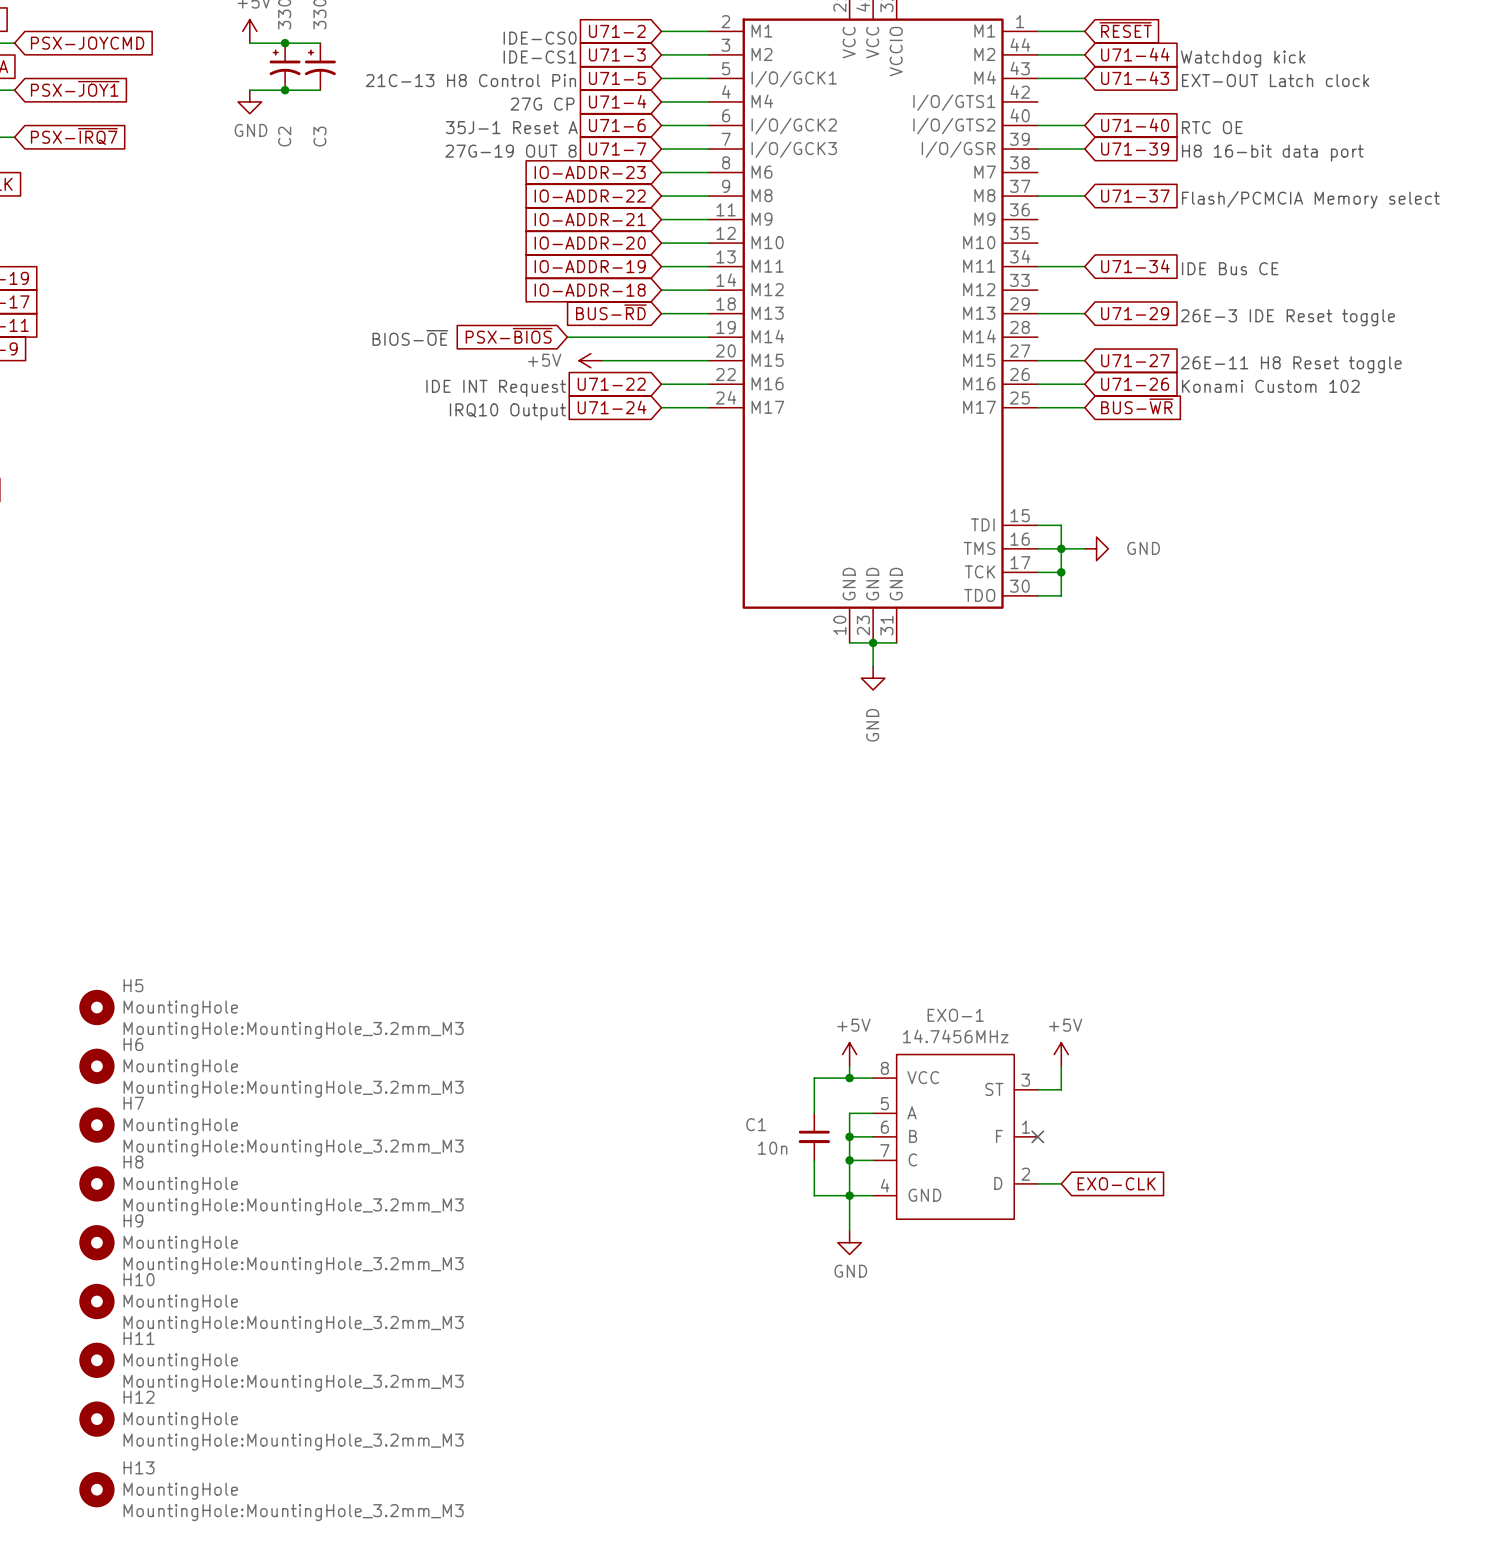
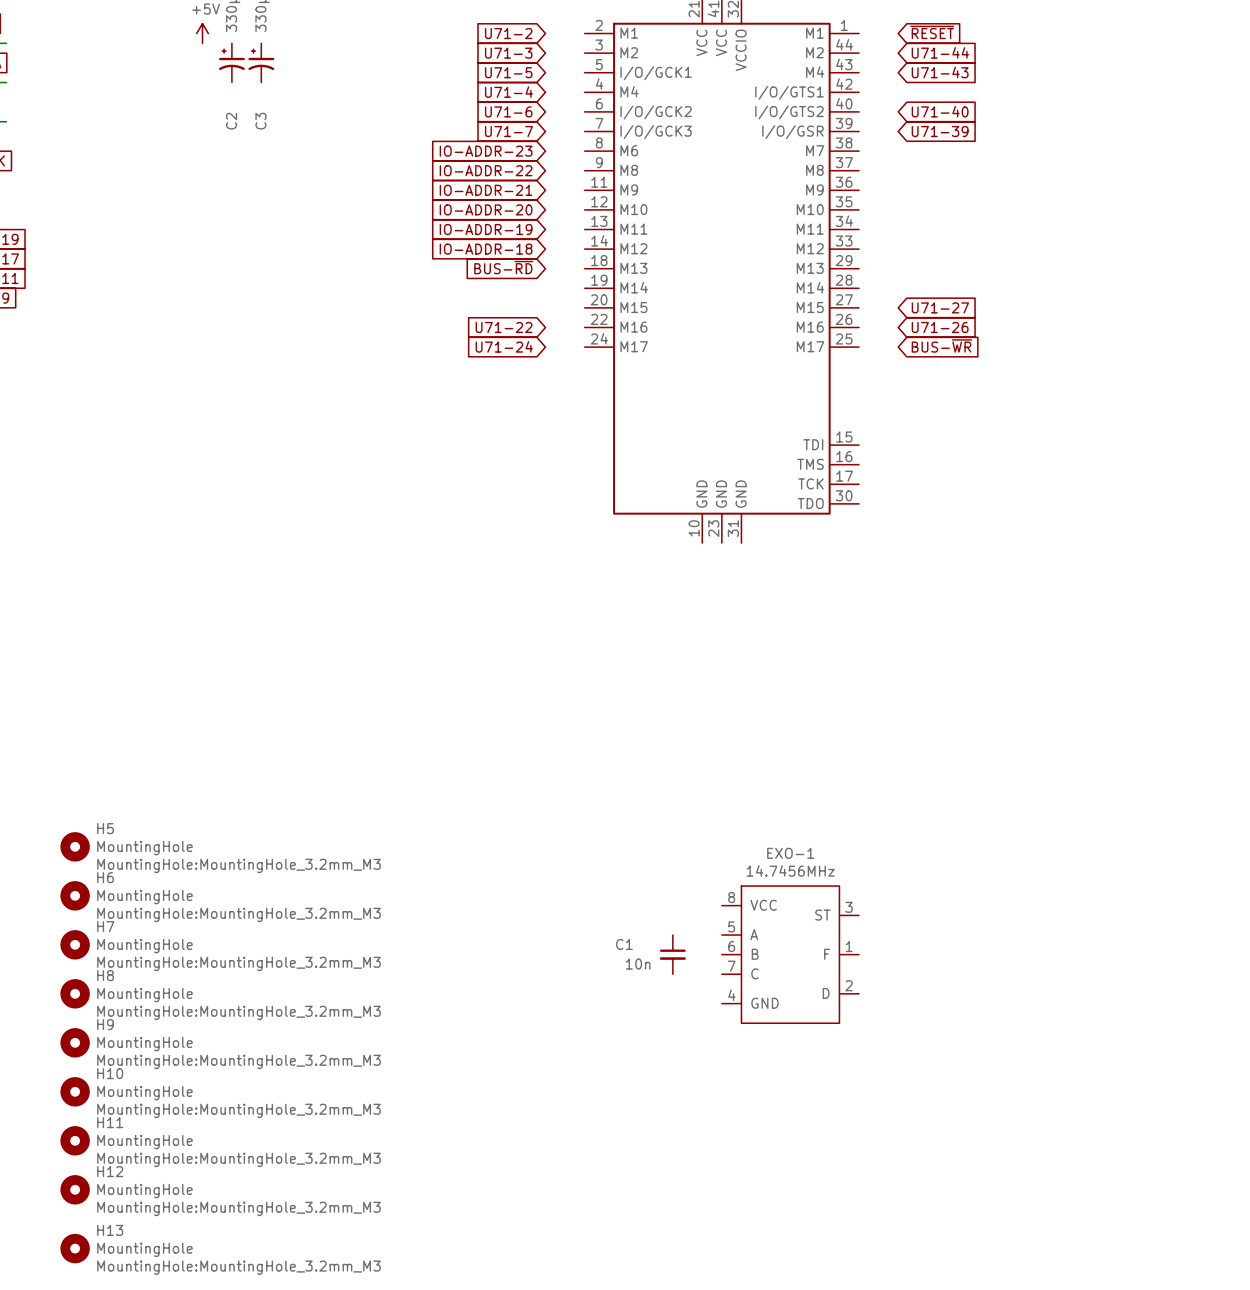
wire: (661, 31) (708, 31) -> none
wire: (1037, 31) (1084, 31) -> none
text: IDE-CS0 (540, 38) -> none
global label: PSX-JOYCMD (87, 43) -> none
wire: (249, 43) (320, 43) -> none
junction: (285, 43) -> none
wire: (661, 54) (708, 54) -> none
wire: (1037, 54) (1084, 54) -> none
text: IDE-CS1 (540, 57) -> none
text: Watchdog kick (1243, 59) -> none
wire: (661, 78) (708, 78) -> none
wire: (1037, 78) (1084, 78) -> none
text: 21C-13 H8 Control Pin (470, 80) -> none
text: EXT-OUT Latch clock (1275, 80) -> none
global label: PSX-~{JOY1} (75, 88) -> none
wire: (249, 90) (320, 90) -> none
junction: (285, 90) -> none
power symbol: GND (249, 101) -> none
wire: (661, 101) (708, 101) -> none
text: 27G CP (542, 104) -> none
wire: (661, 125) (708, 125) -> none
wire: (1037, 125) (1084, 125) -> none
text: 35J-1 Reset A (511, 127) -> none
text: RTC OE (1212, 127) -> none
global label: PSX-~{IRQ7} (74, 136) -> none
wire: (661, 149) (708, 149) -> none
wire: (1037, 149) (1084, 149) -> none
text: 27G-19 OUT 8 (510, 151) -> none
text: H8 16-bit data port (1272, 153) -> none
wire: (661, 172) (708, 172) -> none
wire: (661, 196) (708, 196) -> none
wire: (1037, 196) (1084, 196) -> none
global label: U71-37 (1135, 196) -> none
text: Flash/PCMCIA Memory select (1310, 199) -> none
wire: (661, 219) (708, 219) -> none
wire: (661, 243) (708, 243) -> none
wire: (661, 266) (708, 266) -> none
wire: (1037, 266) (1084, 266) -> none
global label: U71-34 (1135, 266) -> none
text: IDE Bus CE (1230, 268) -> none
wire: (661, 290) (708, 290) -> none
wire: (661, 313) (708, 313) -> none
wire: (1037, 313) (1084, 313) -> none
global label: U71-29 (1135, 313) -> none
text: 26E-3 IDE Reset toggle (1287, 317) -> none
global label: PSX-~{BIOS} (509, 335) -> none
text: BIOS-~{OE} (410, 337) -> none
wire: (567, 337) (708, 337) -> none
power symbol: +5V (590, 360) -> none
wire: (602, 360) (708, 360) -> none
wire: (1037, 360) (1084, 360) -> none
text: 26E-11 H8 Reset toggle (1291, 364) -> none
wire: (661, 384) (708, 384) -> none
wire: (1037, 384) (1084, 384) -> none
text: Konami Custom 102 (1270, 386) -> none
text: IDE INT Request (496, 388) -> none
wire: (661, 407) (708, 407) -> none
wire: (1037, 407) (1084, 407) -> none
text: IRQ10 Output (507, 411) -> none
wire: (1037, 525) (1061, 525) (1061, 595) (1037, 595) -> none
wire: (1037, 548) (1084, 548) -> none
junction: (1061, 548) -> none
power symbol: GND (1096, 548) -> none
wire: (1037, 572) (1061, 572) -> none
junction: (1061, 572) -> none
wire: (849, 642) (896, 642) -> none
wire: (873, 642) (873, 666) -> none
junction: (873, 642) -> none
power symbol: GND (873, 678) -> none
power symbol: +5V (849, 1054) -> none
power symbol: +5V (1061, 1054) -> none
wire: (849, 1066) (849, 1078) -> none
wire: (1061, 1066) (1061, 1089) (1037, 1089) -> none
junction: (849, 1078) -> none
wire: (873, 1078) (814, 1078) (814, 1113) -> none
wire: (873, 1113) (849, 1113) (849, 1230) -> none
wire: (849, 1136) (873, 1136) -> none
junction: (849, 1136) -> none
no-connect mark: (1037, 1136) -> none
wire: (814, 1160) (814, 1195) (873, 1195) -> none
wire: (849, 1160) (873, 1160) -> none
junction: (849, 1160) -> none
wire: (1037, 1183) (1061, 1183) -> none
global label: EXO-CLK (1116, 1183) -> none
junction: (849, 1195) -> none
power symbol: GND (849, 1242) -> none

